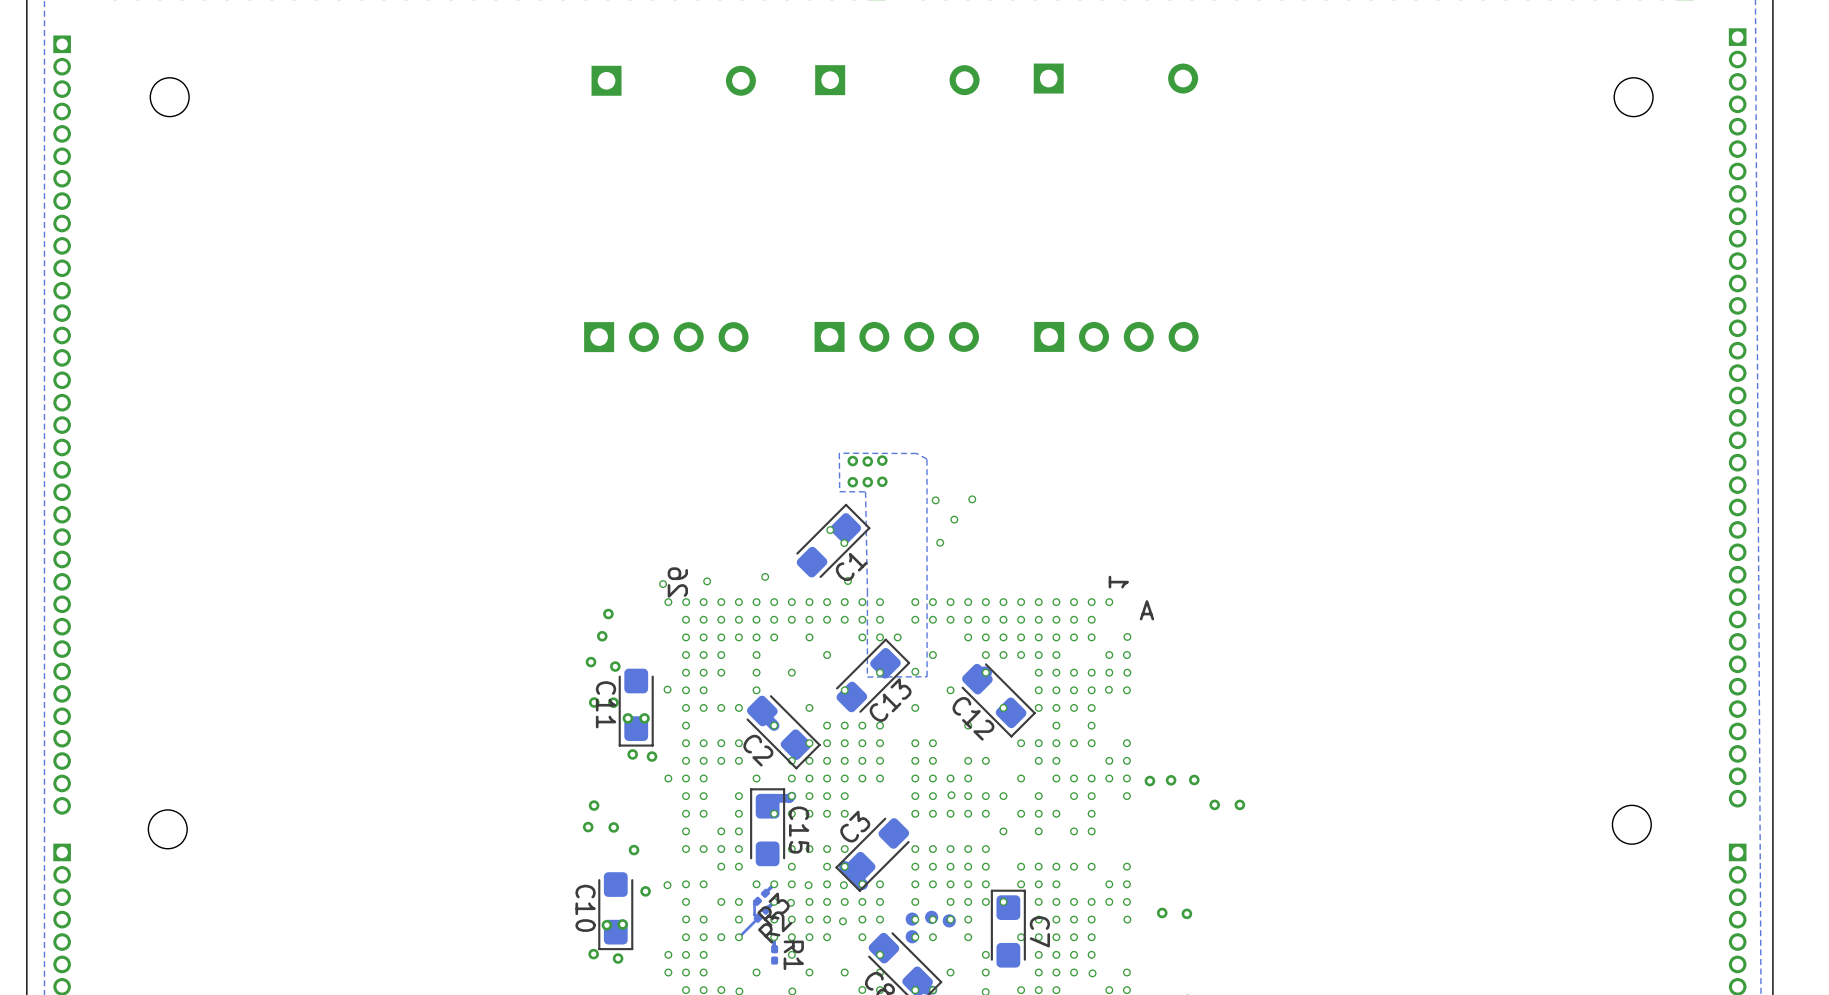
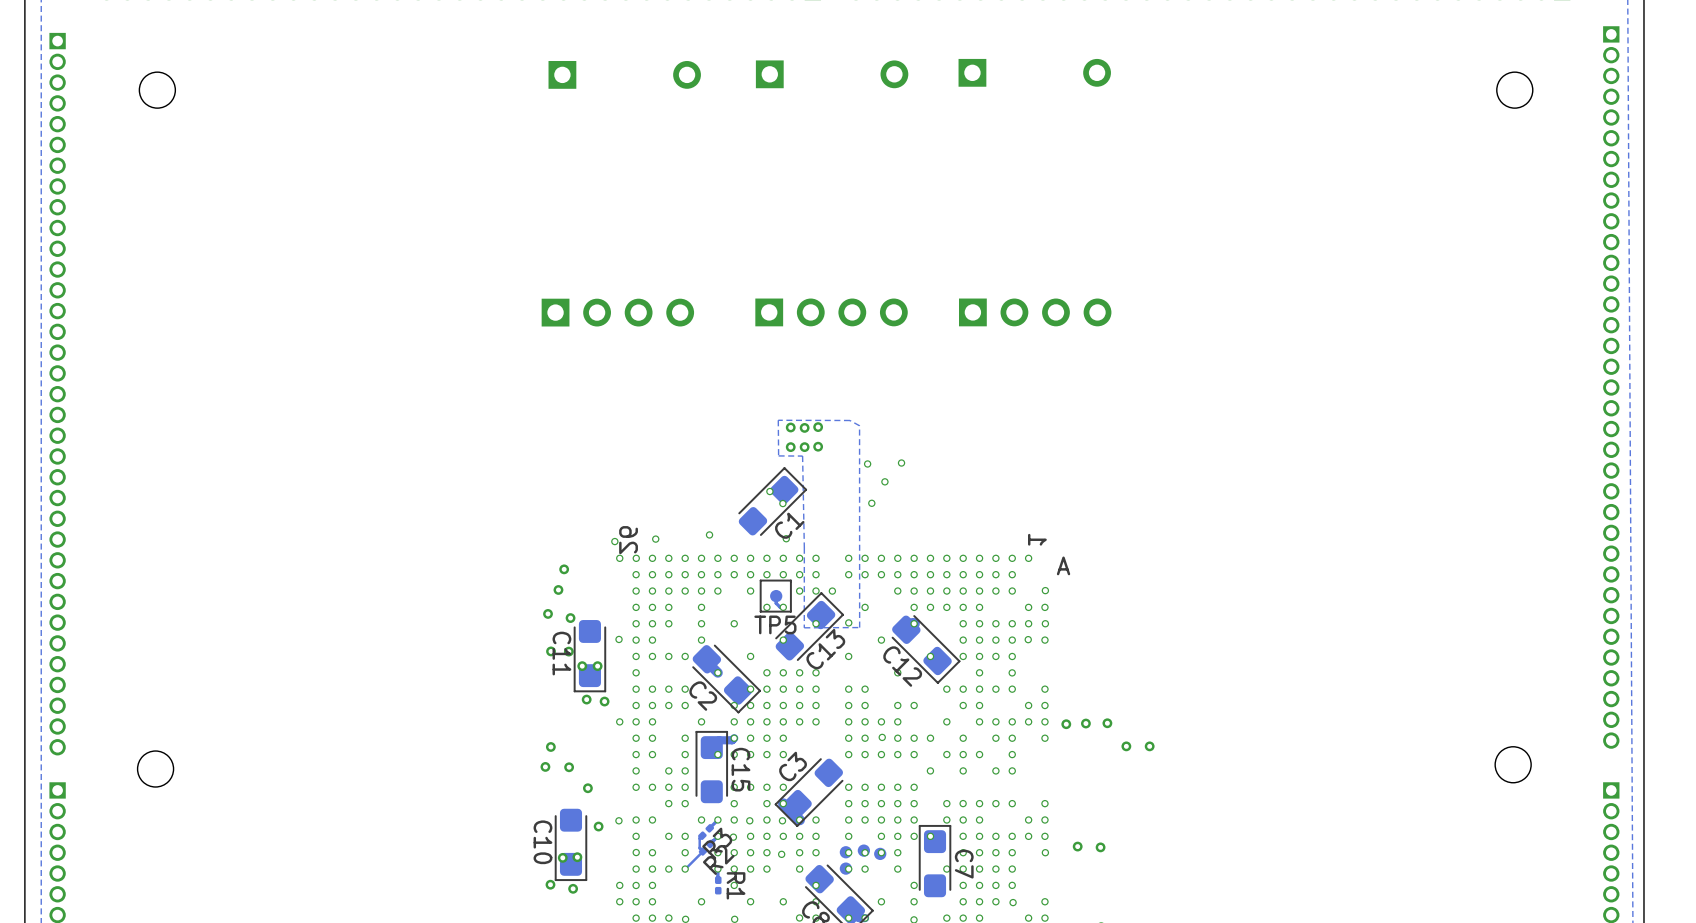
TP5: none -> (775, 596)
track: none -> (776, 596) (776, 603) (780, 607) (783, 607)
via: none -> (783, 607)

